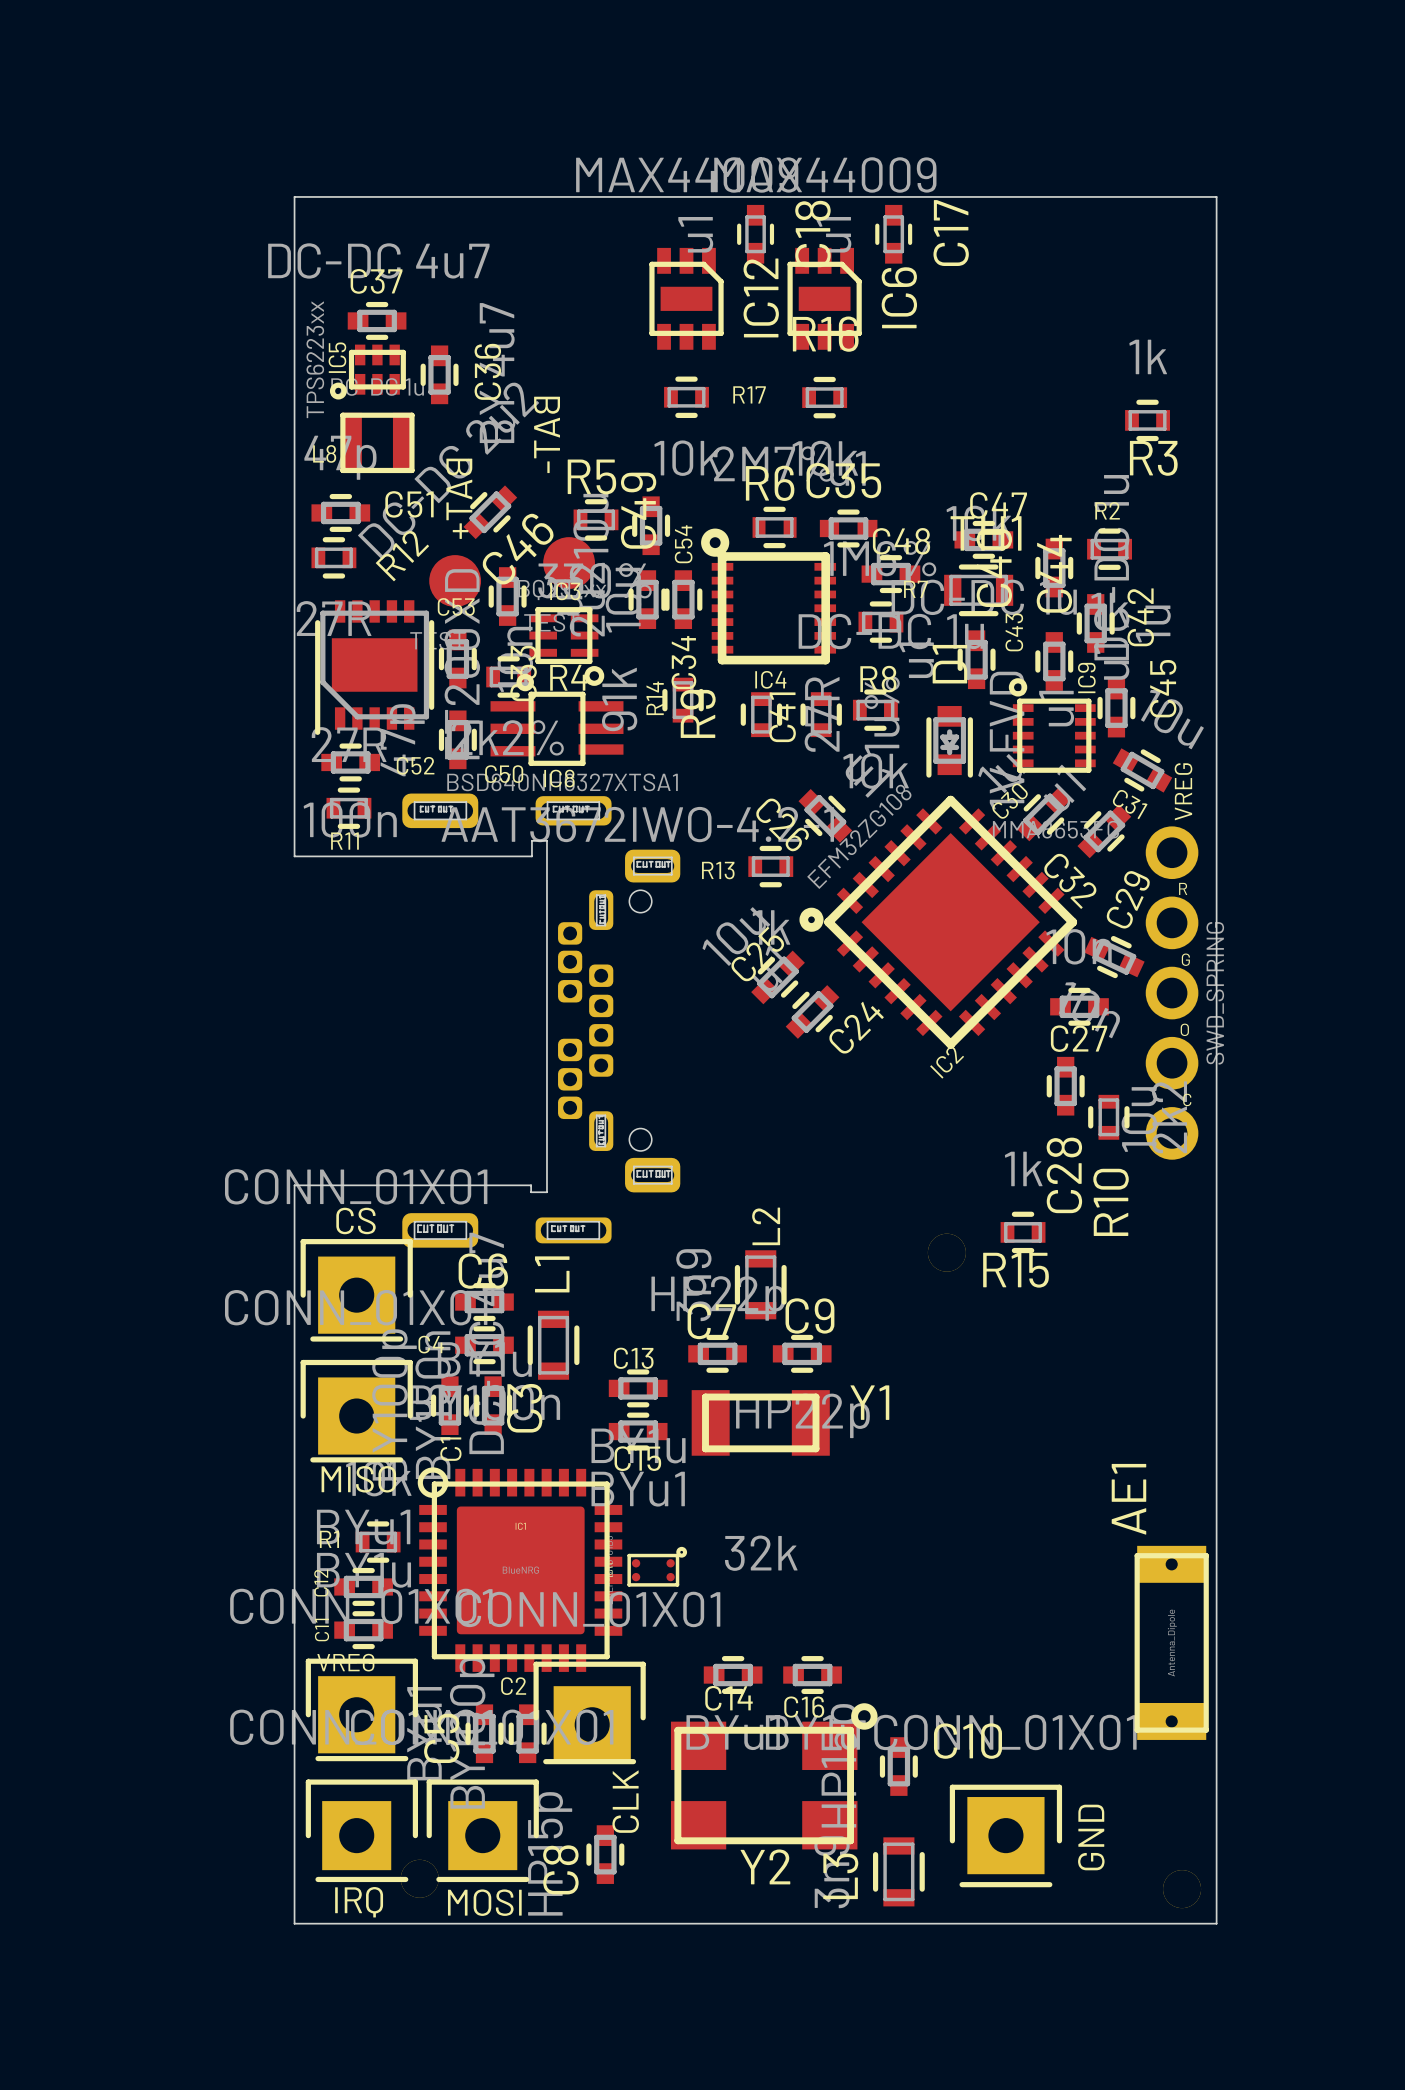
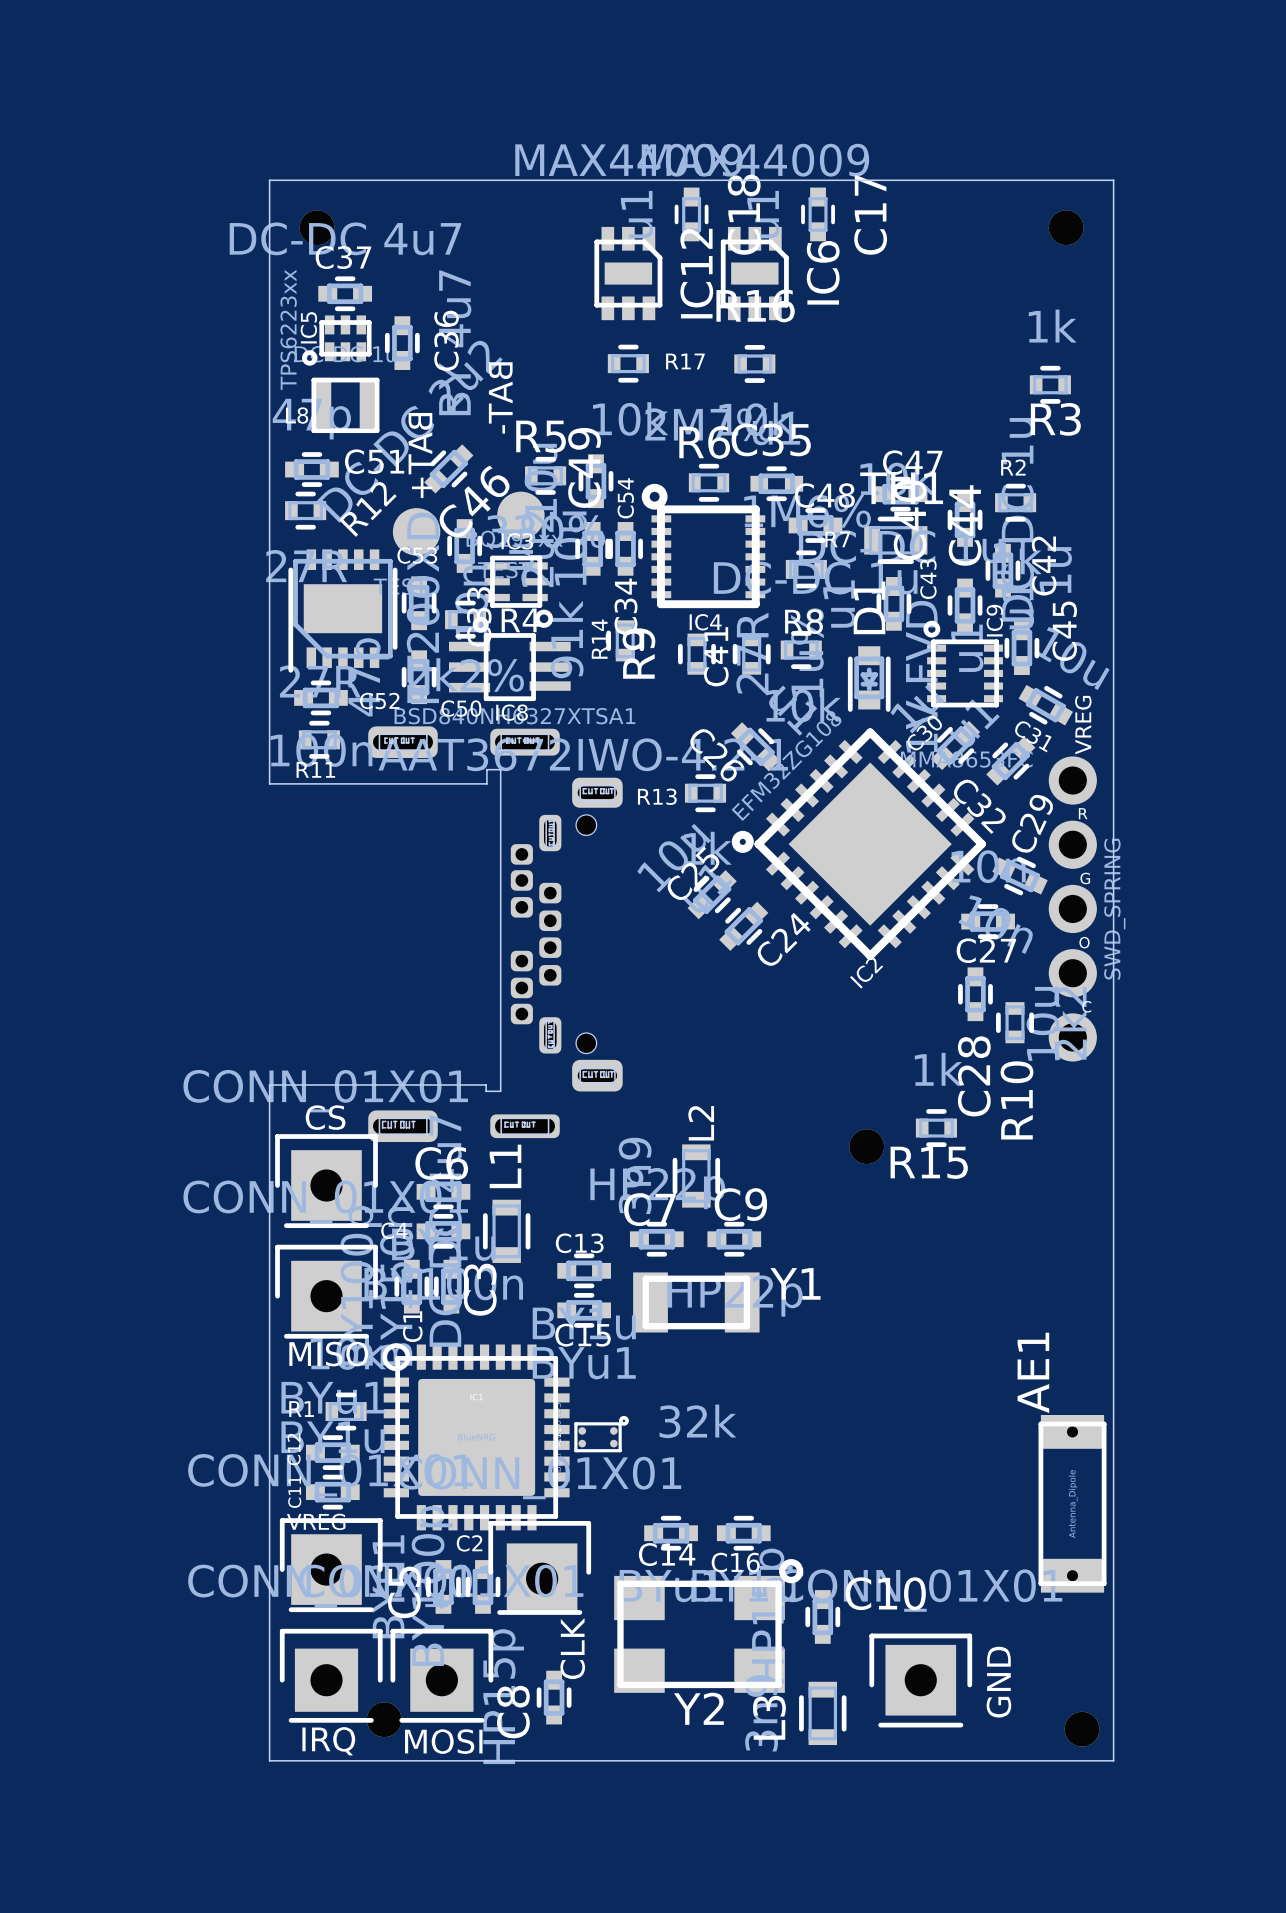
part: none -> (317, 227)
part: none -> (1066, 227)

